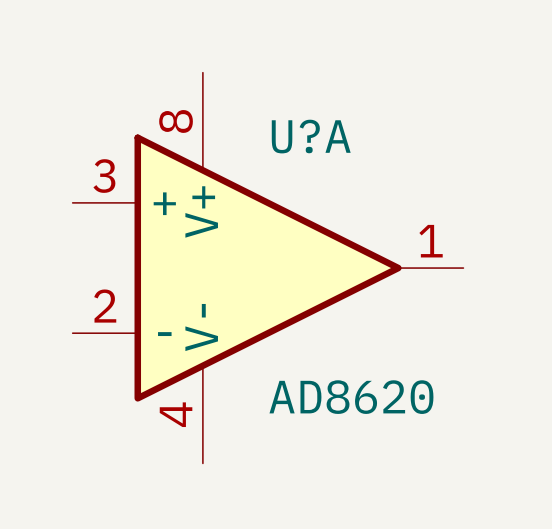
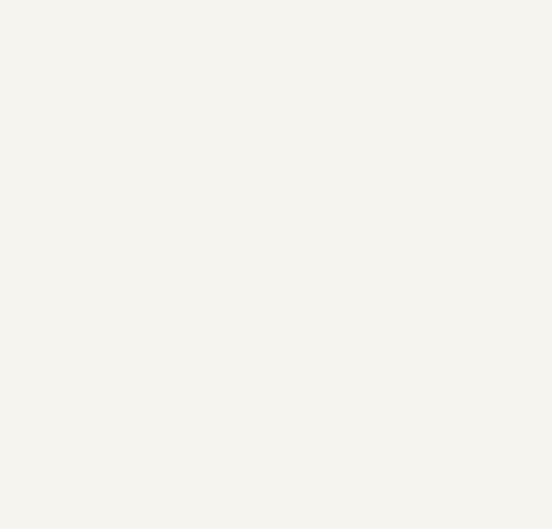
U?A: AD8620 (268, 268) -> none

